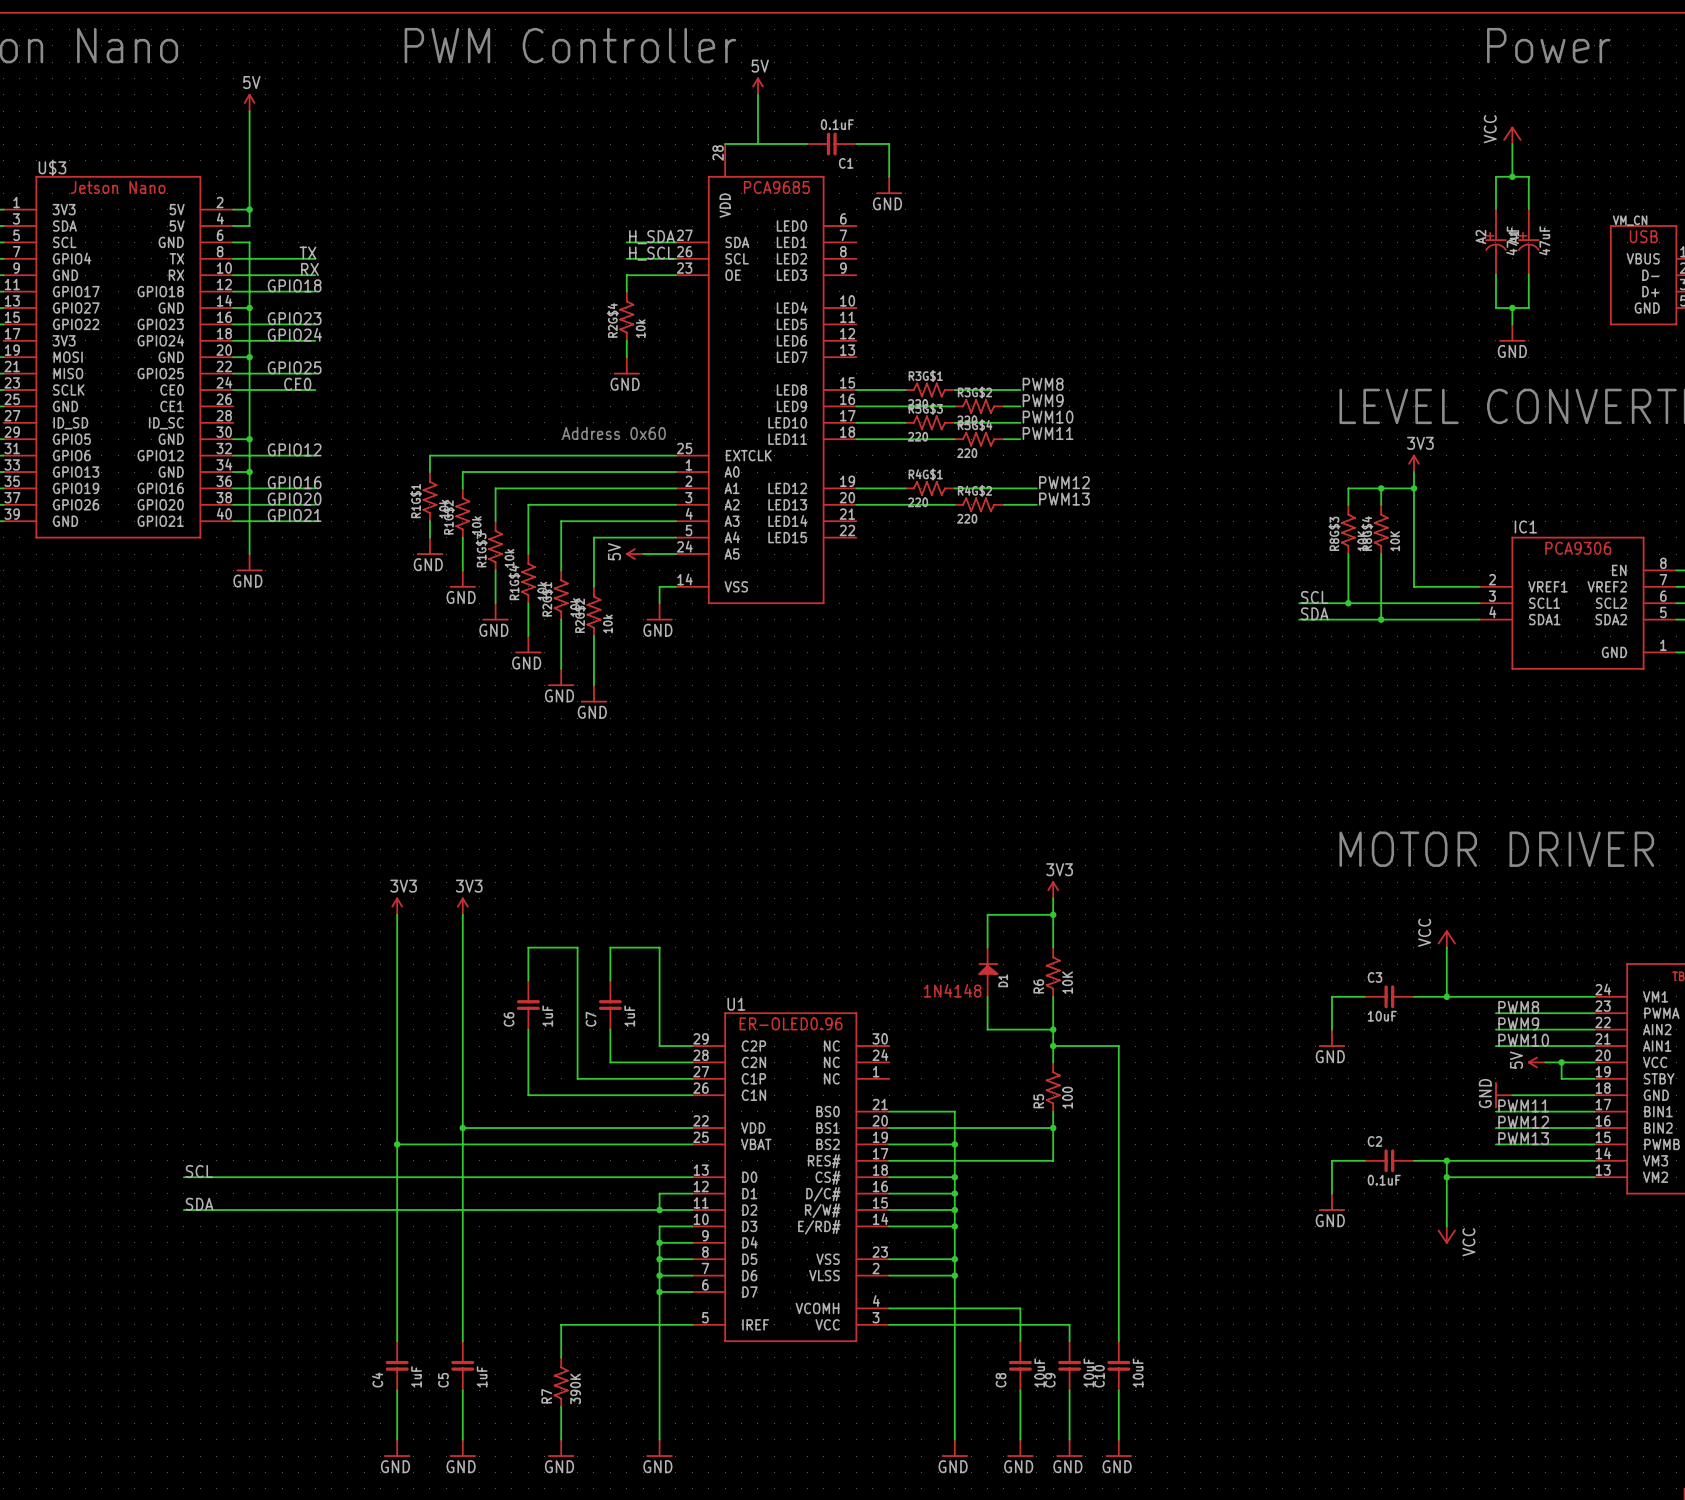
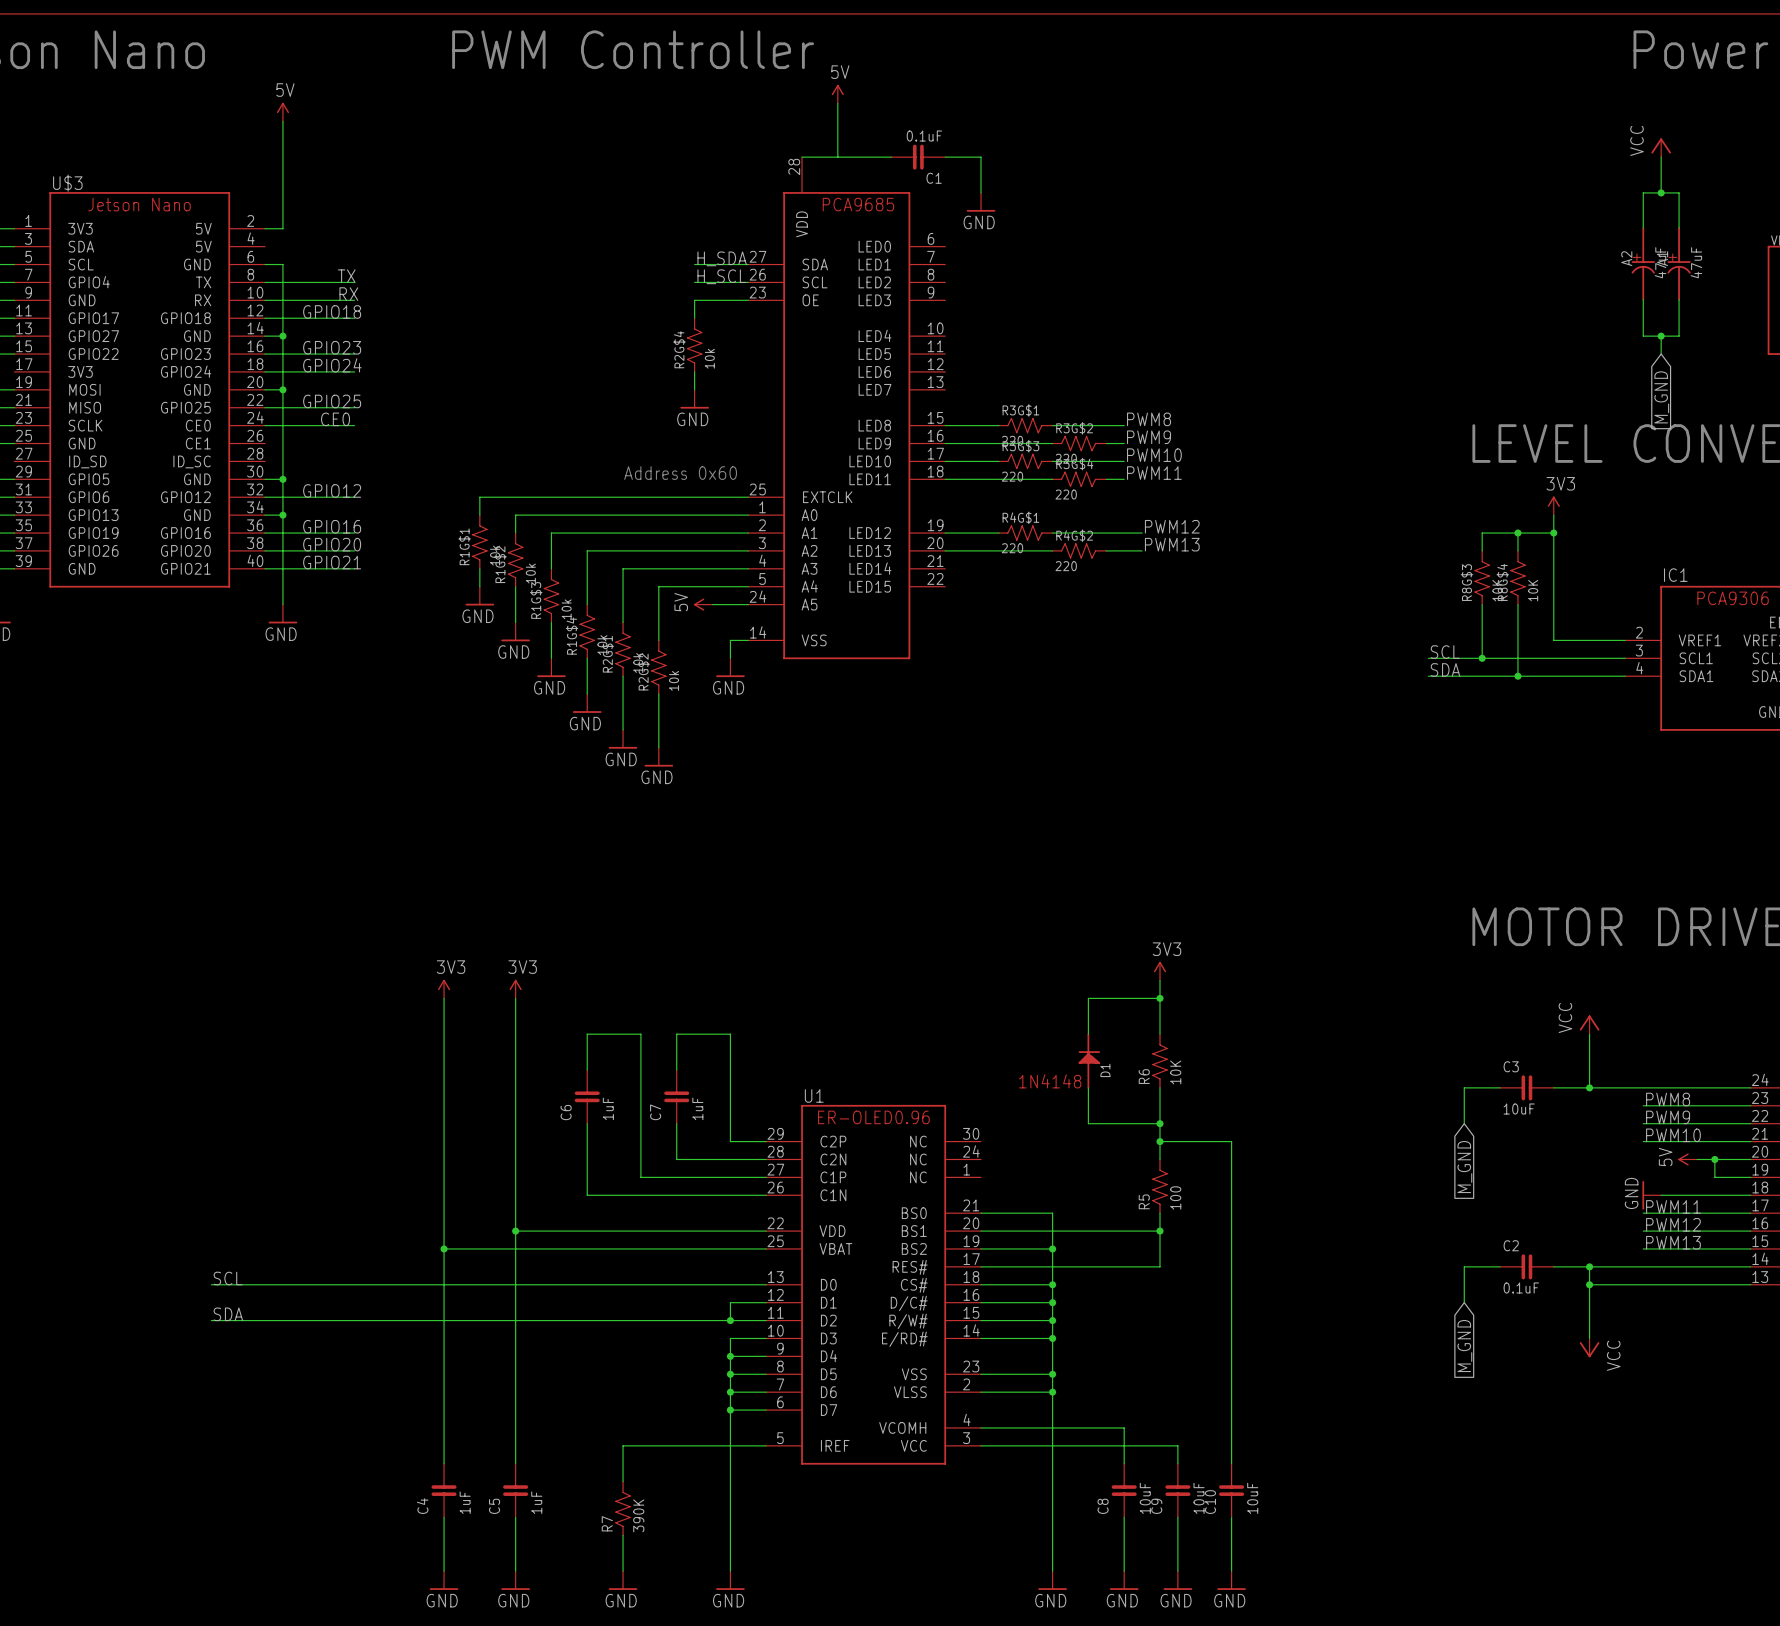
wire: (249, 209) (249, 226) (233, 226) -> none
junction: (249, 209) -> none
power symbol: GND (1512, 333) -> none
global label: none -> M_GND (1661, 397)
power symbol: GND (1331, 1038) -> none
global label: none -> M_GND (1464, 1167)
power symbol: GND (1331, 1202) -> none
global label: none -> M_GND (1464, 1346)

